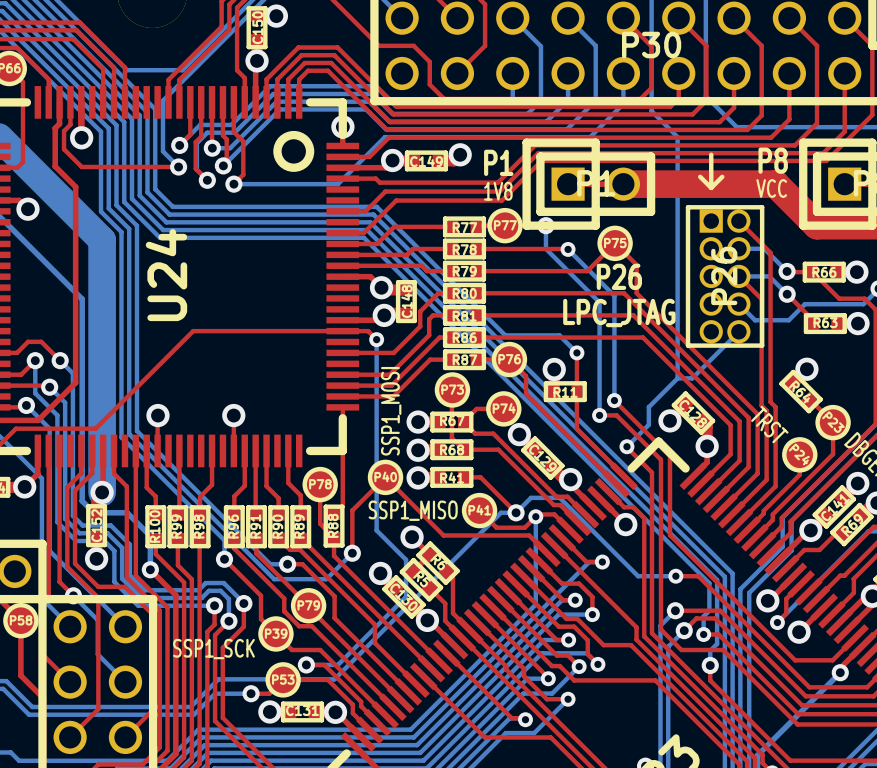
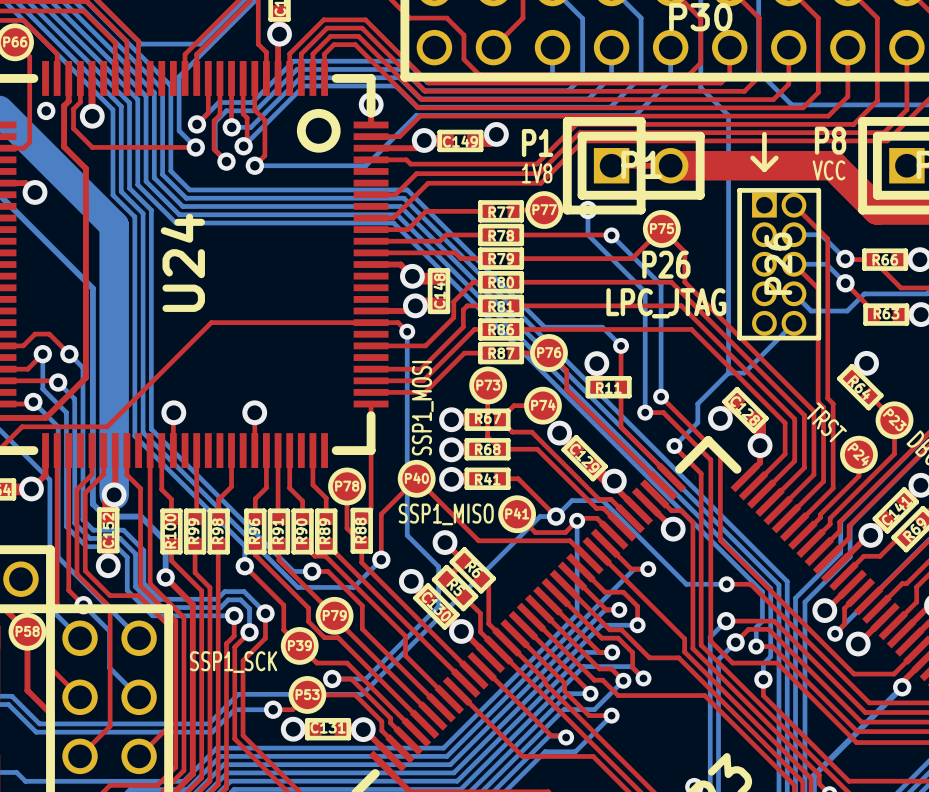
via: none -> (46, 110)

